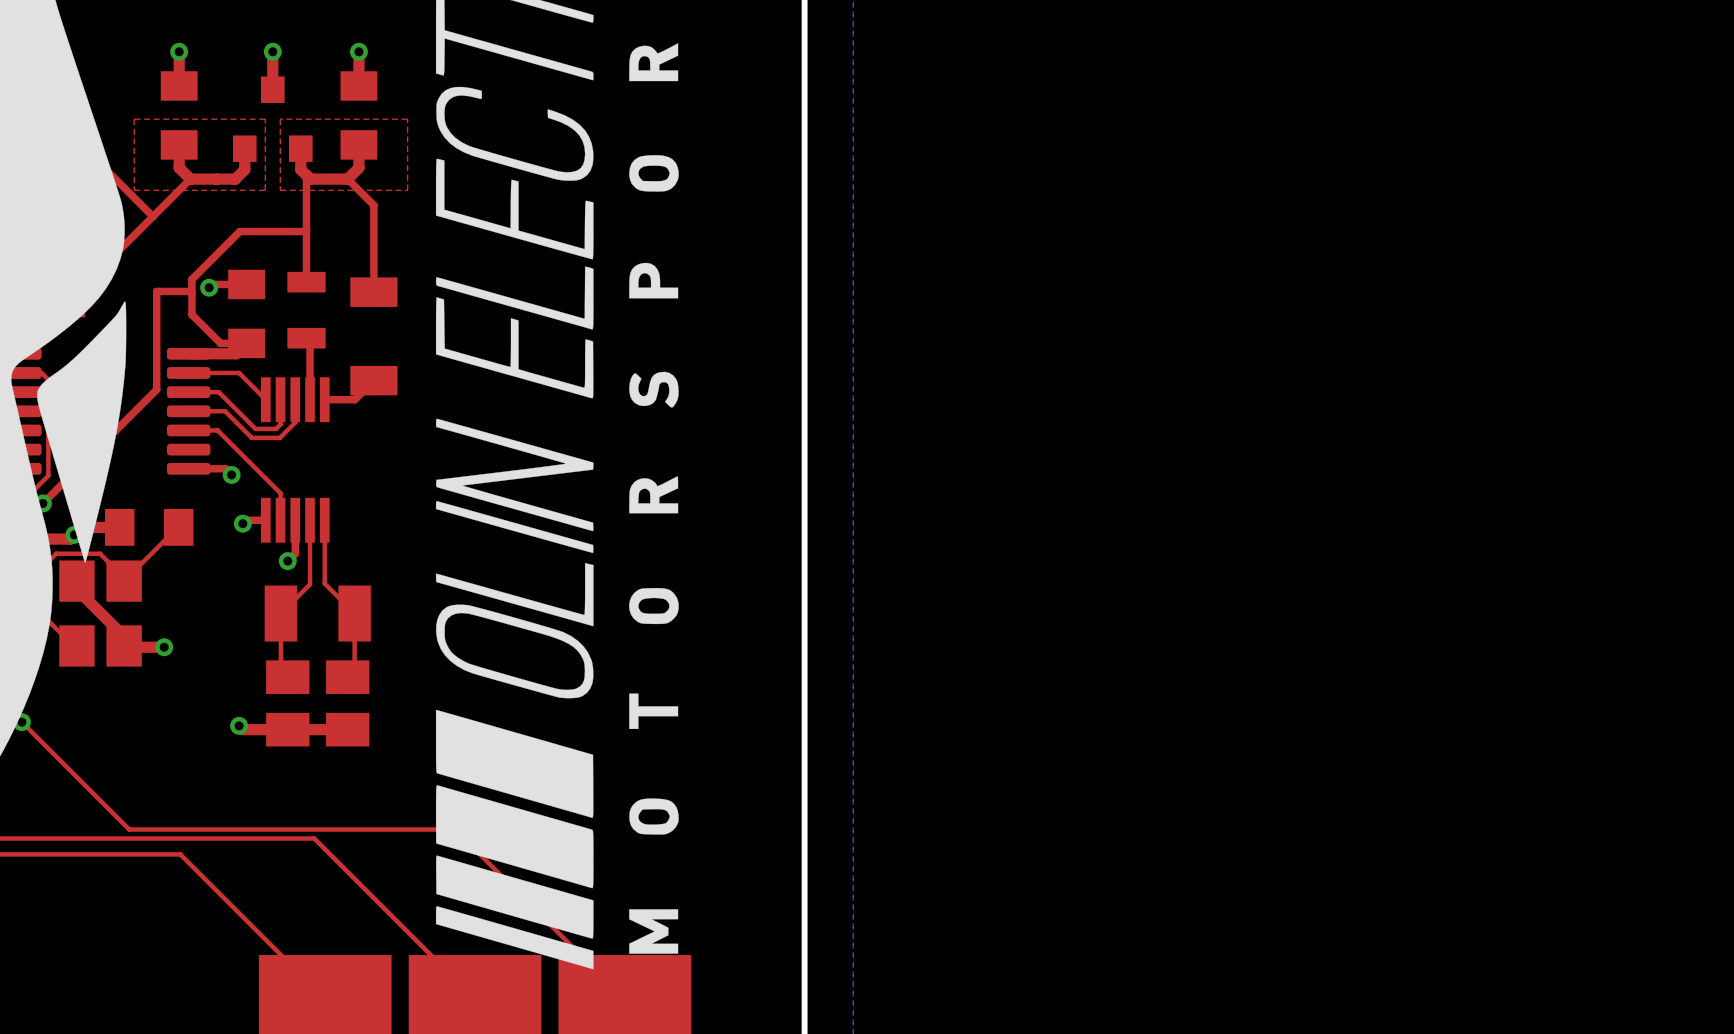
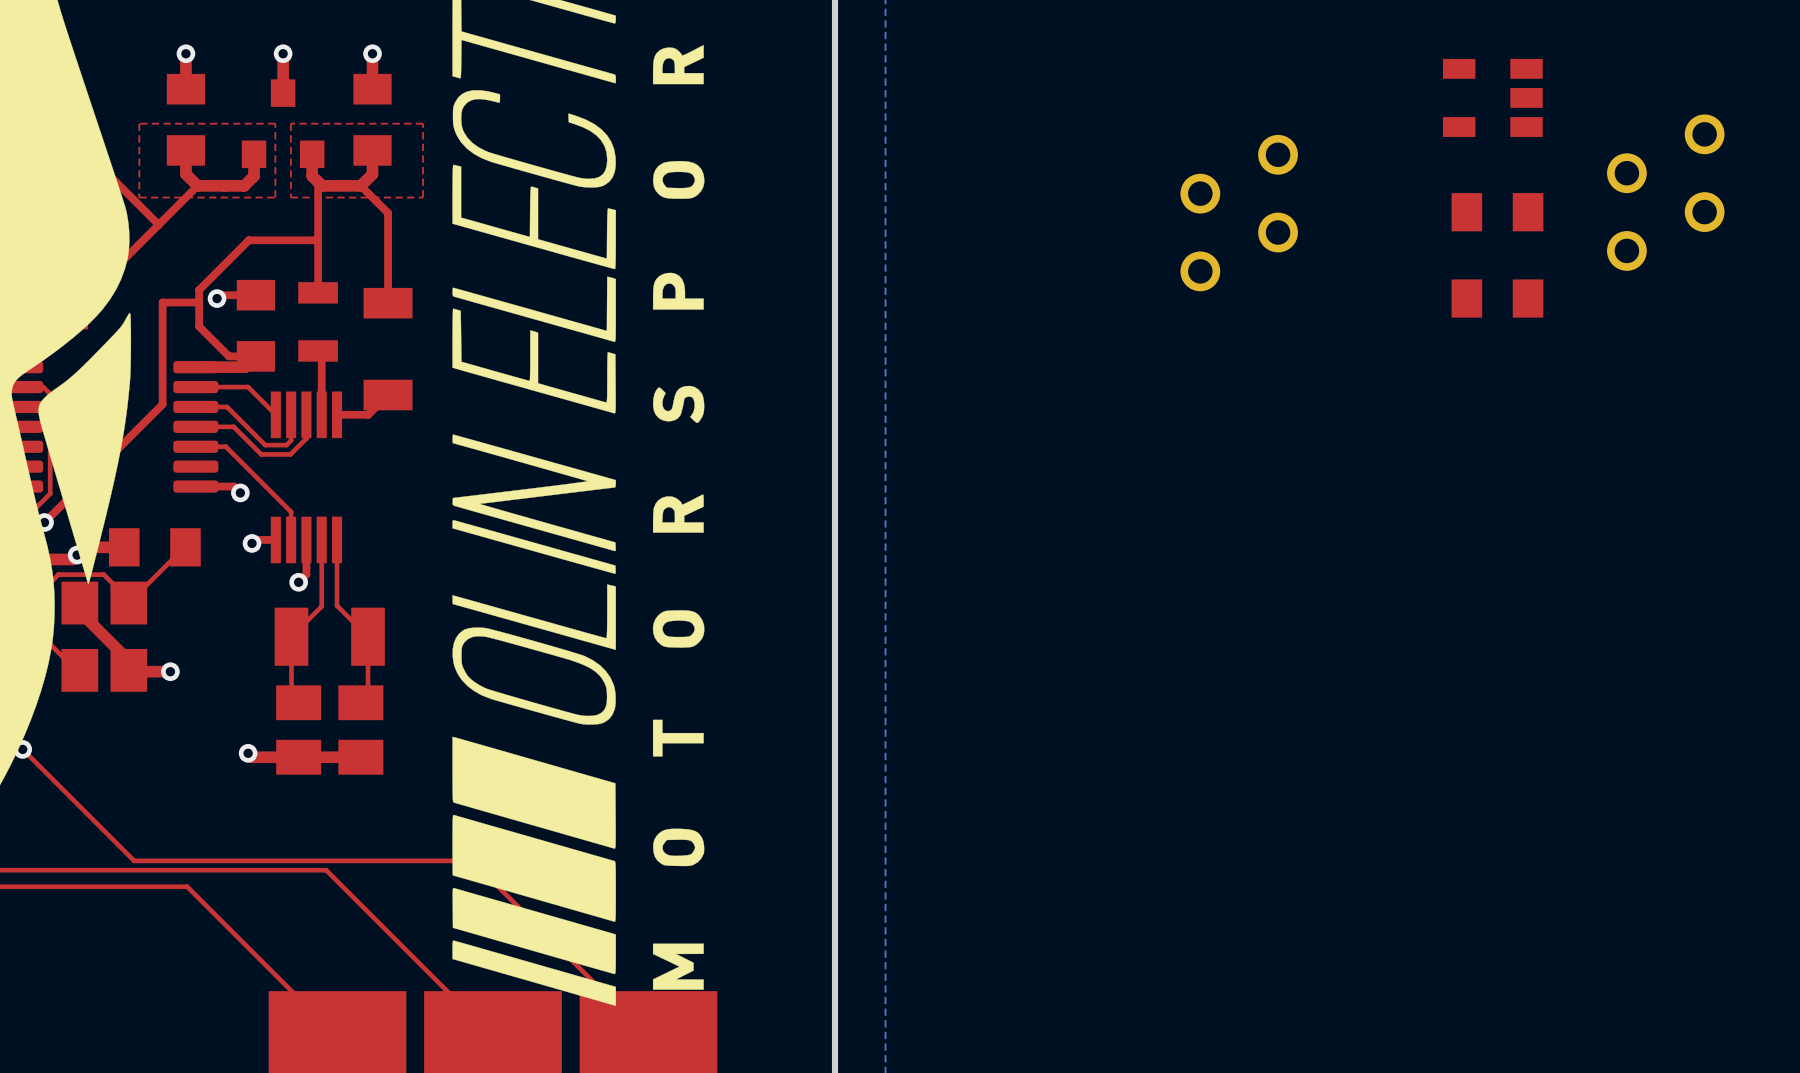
part: none -> (1492, 97)
part: none -> (1665, 192)
part: none -> (1497, 212)
part: none -> (1239, 213)
part: none -> (1497, 298)

